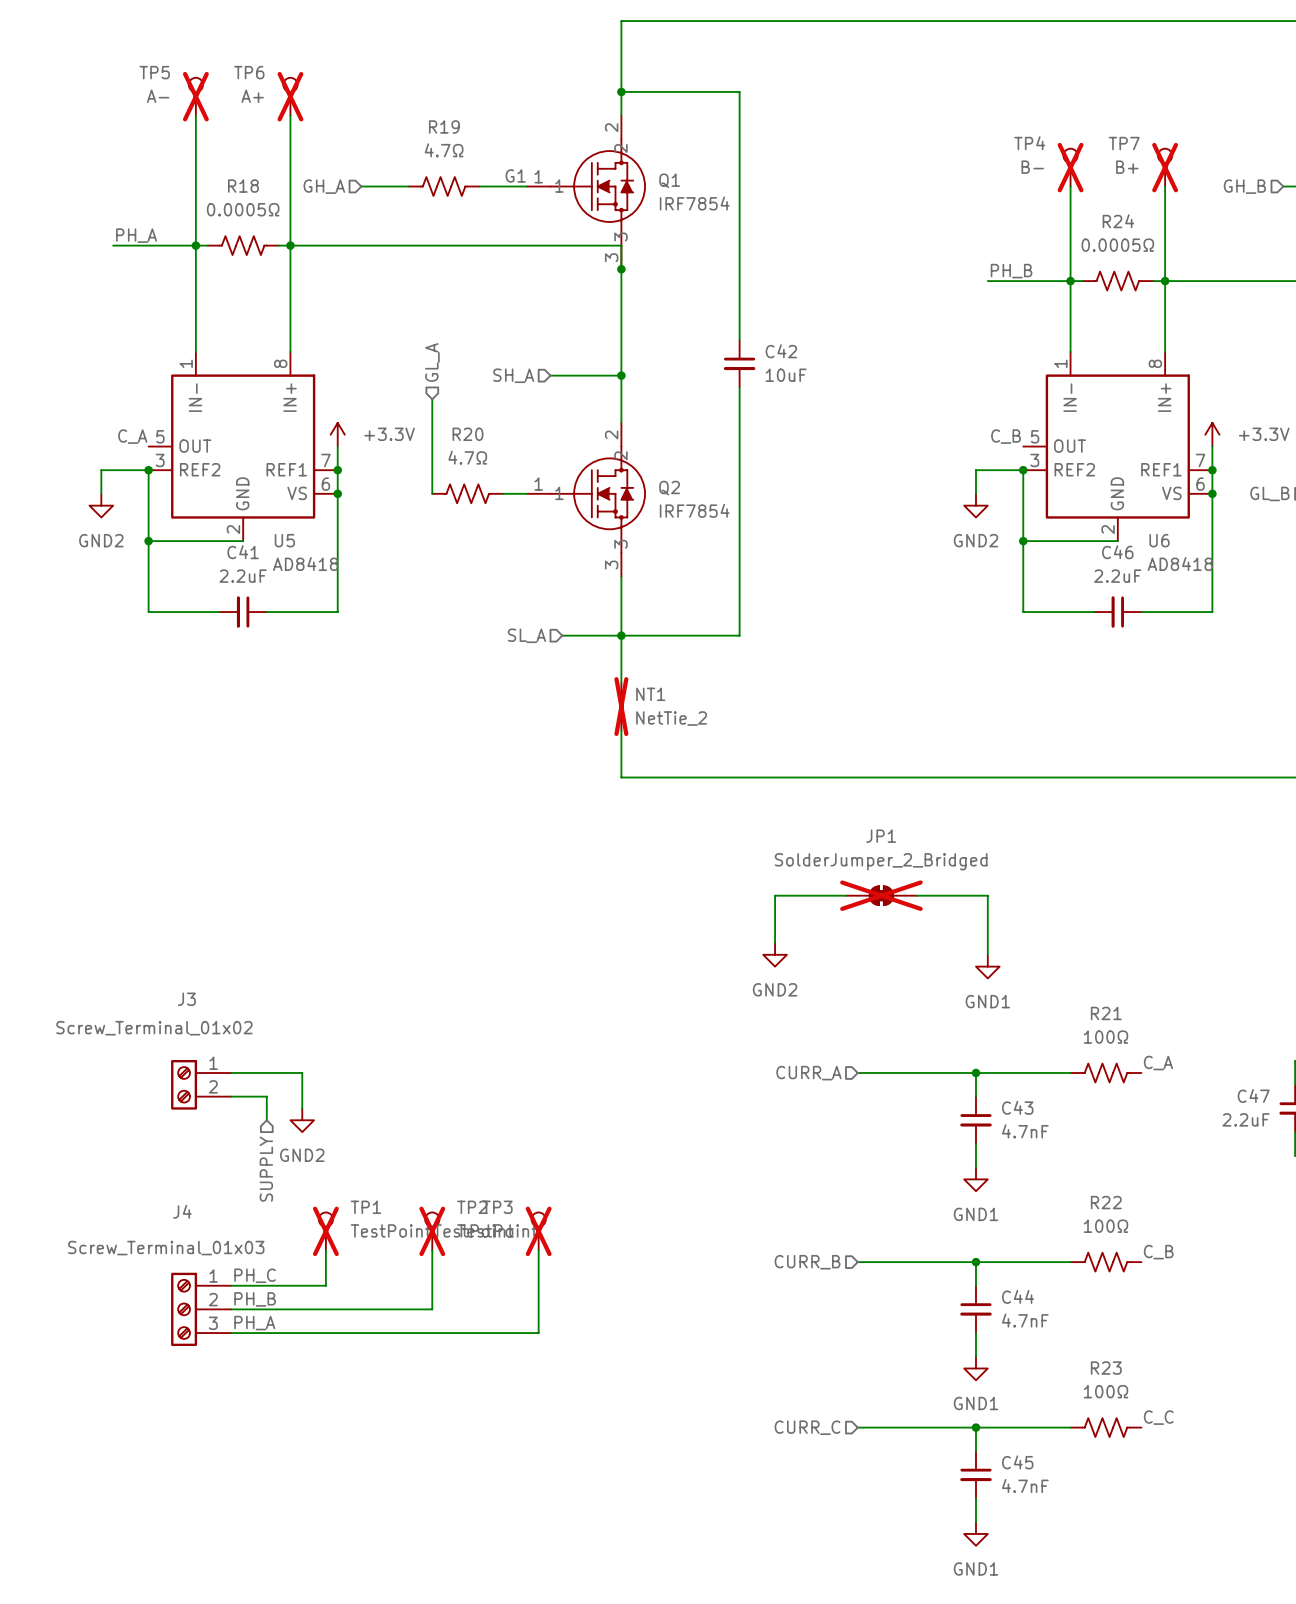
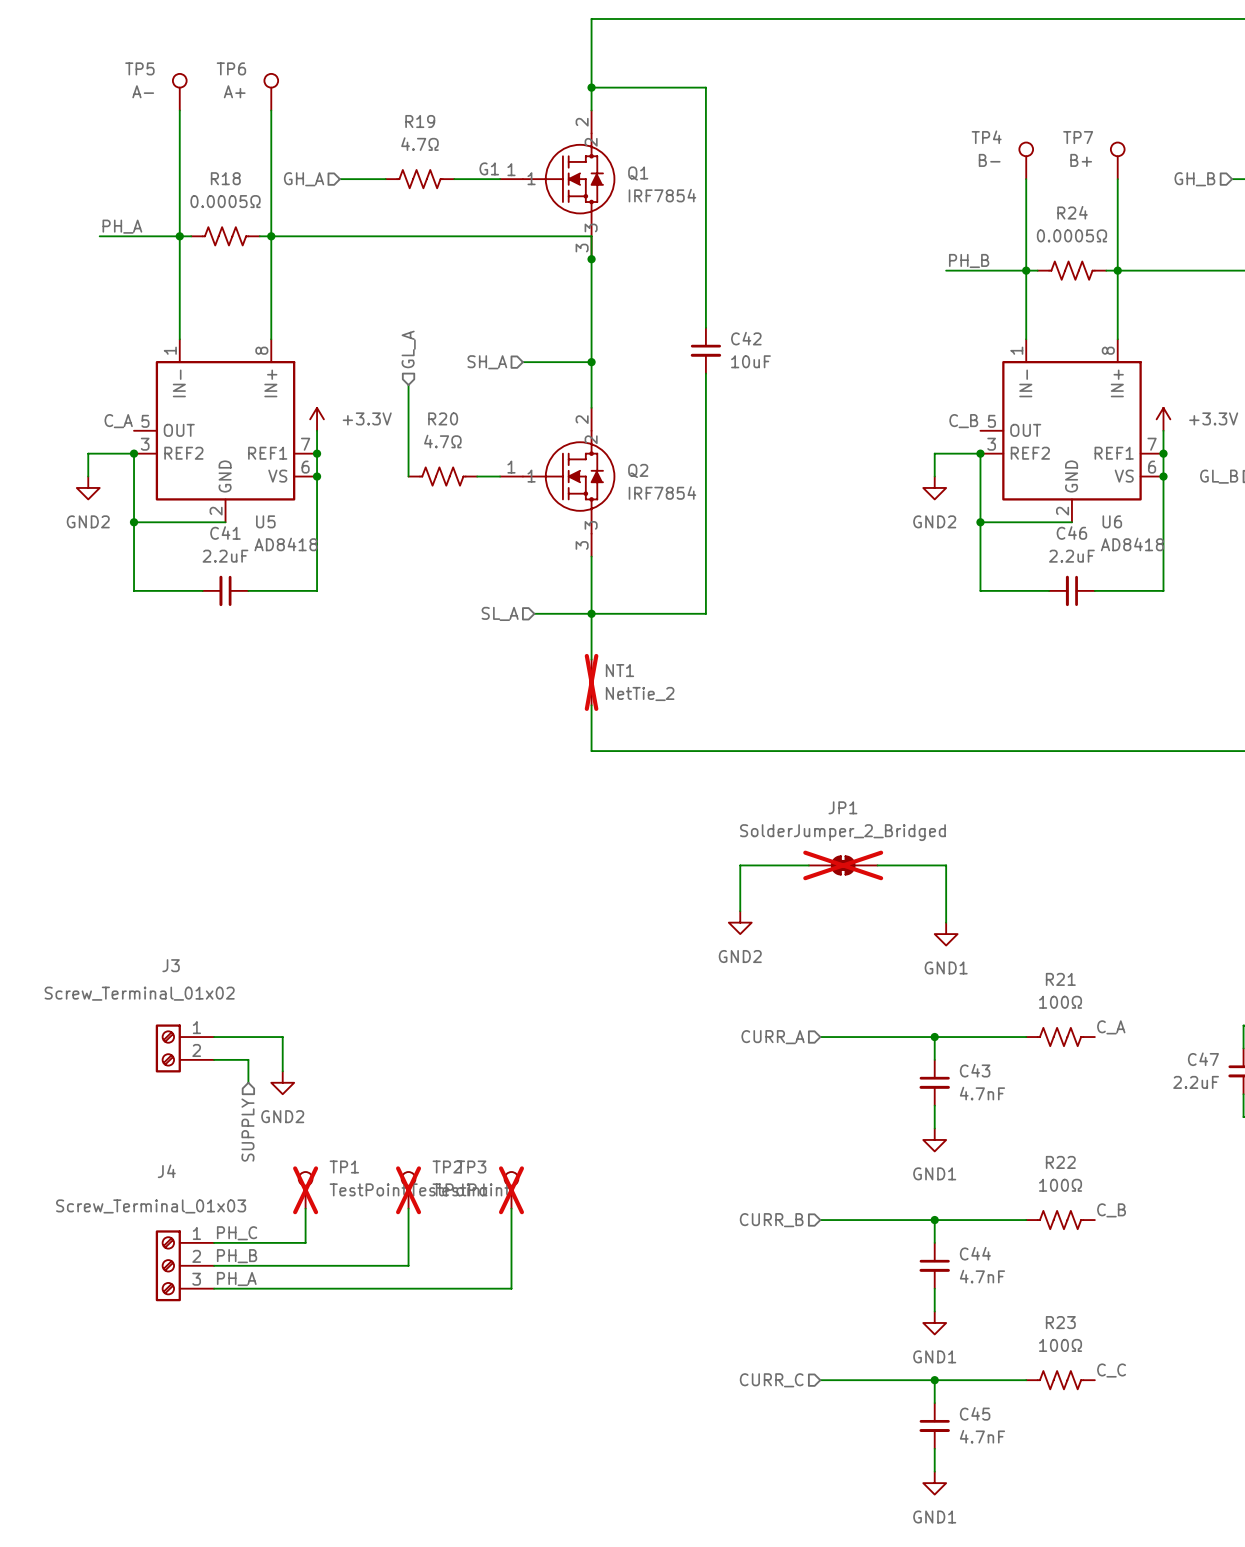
TP5 do-not-place cross: (195, 96) -> none
TP6 do-not-place cross: (290, 96) -> none
TP4 do-not-place cross: (1070, 167) -> none
TP7 do-not-place cross: (1165, 167) -> none

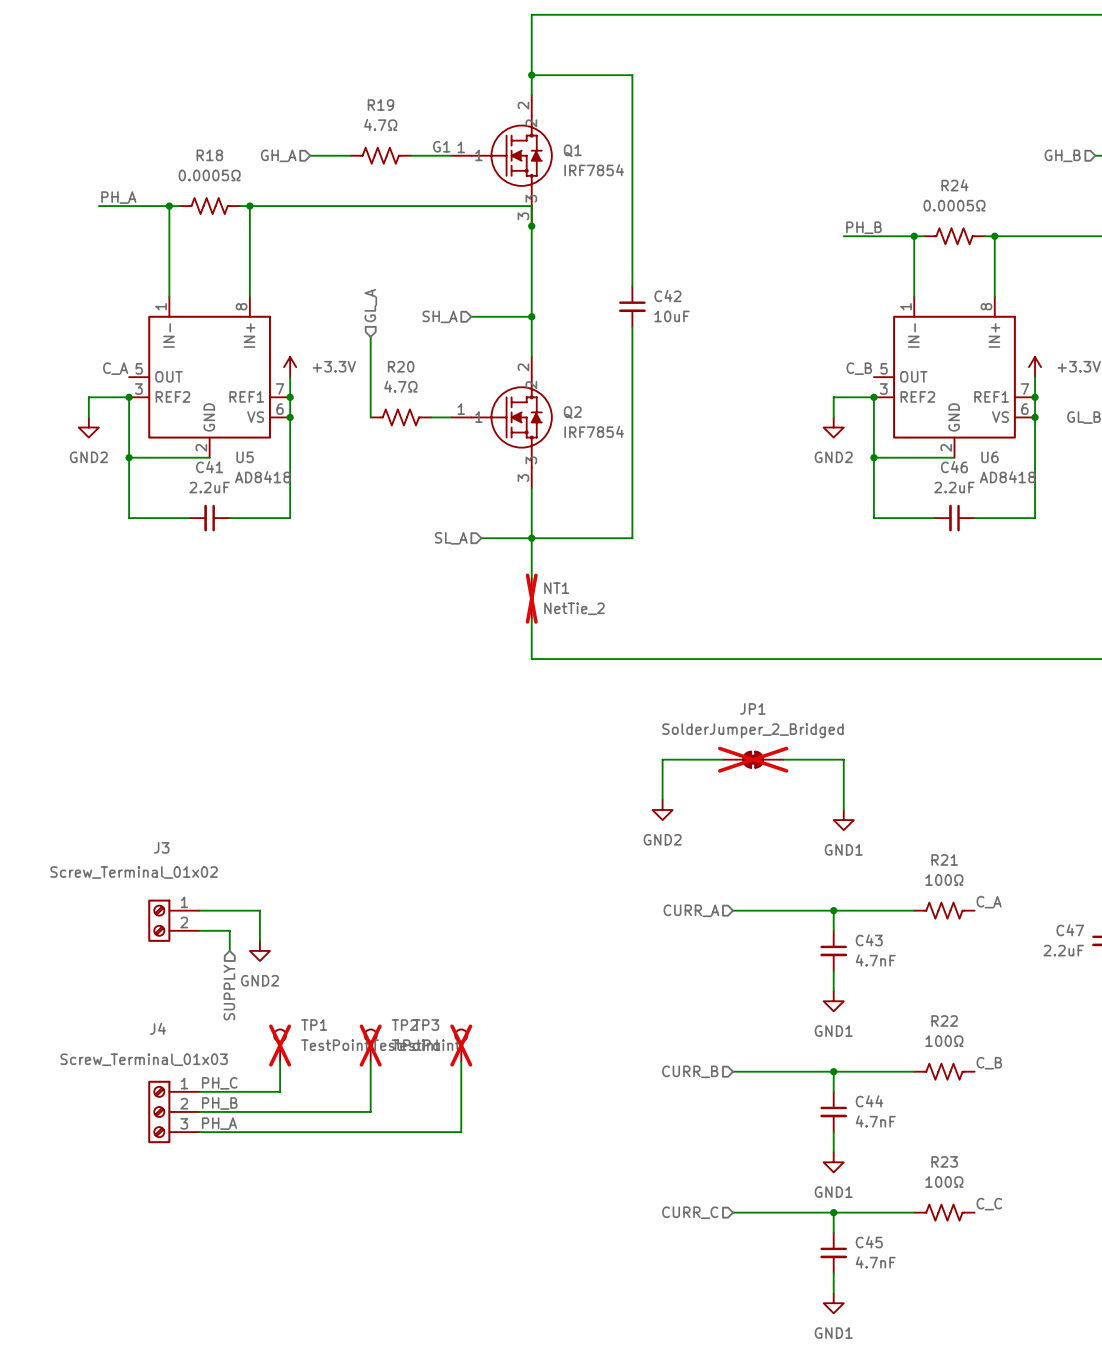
TP5: A- (179, 92) -> none
TP6: A+ (271, 92) -> none
wire: (179, 110) (179, 236) -> none
wire: (271, 110) (271, 236) -> none
TP4: B- (1026, 160) -> none
TP7: B+ (1117, 160) -> none
wire: (1026, 179) (1026, 270) -> none
wire: (1117, 179) (1117, 270) -> none

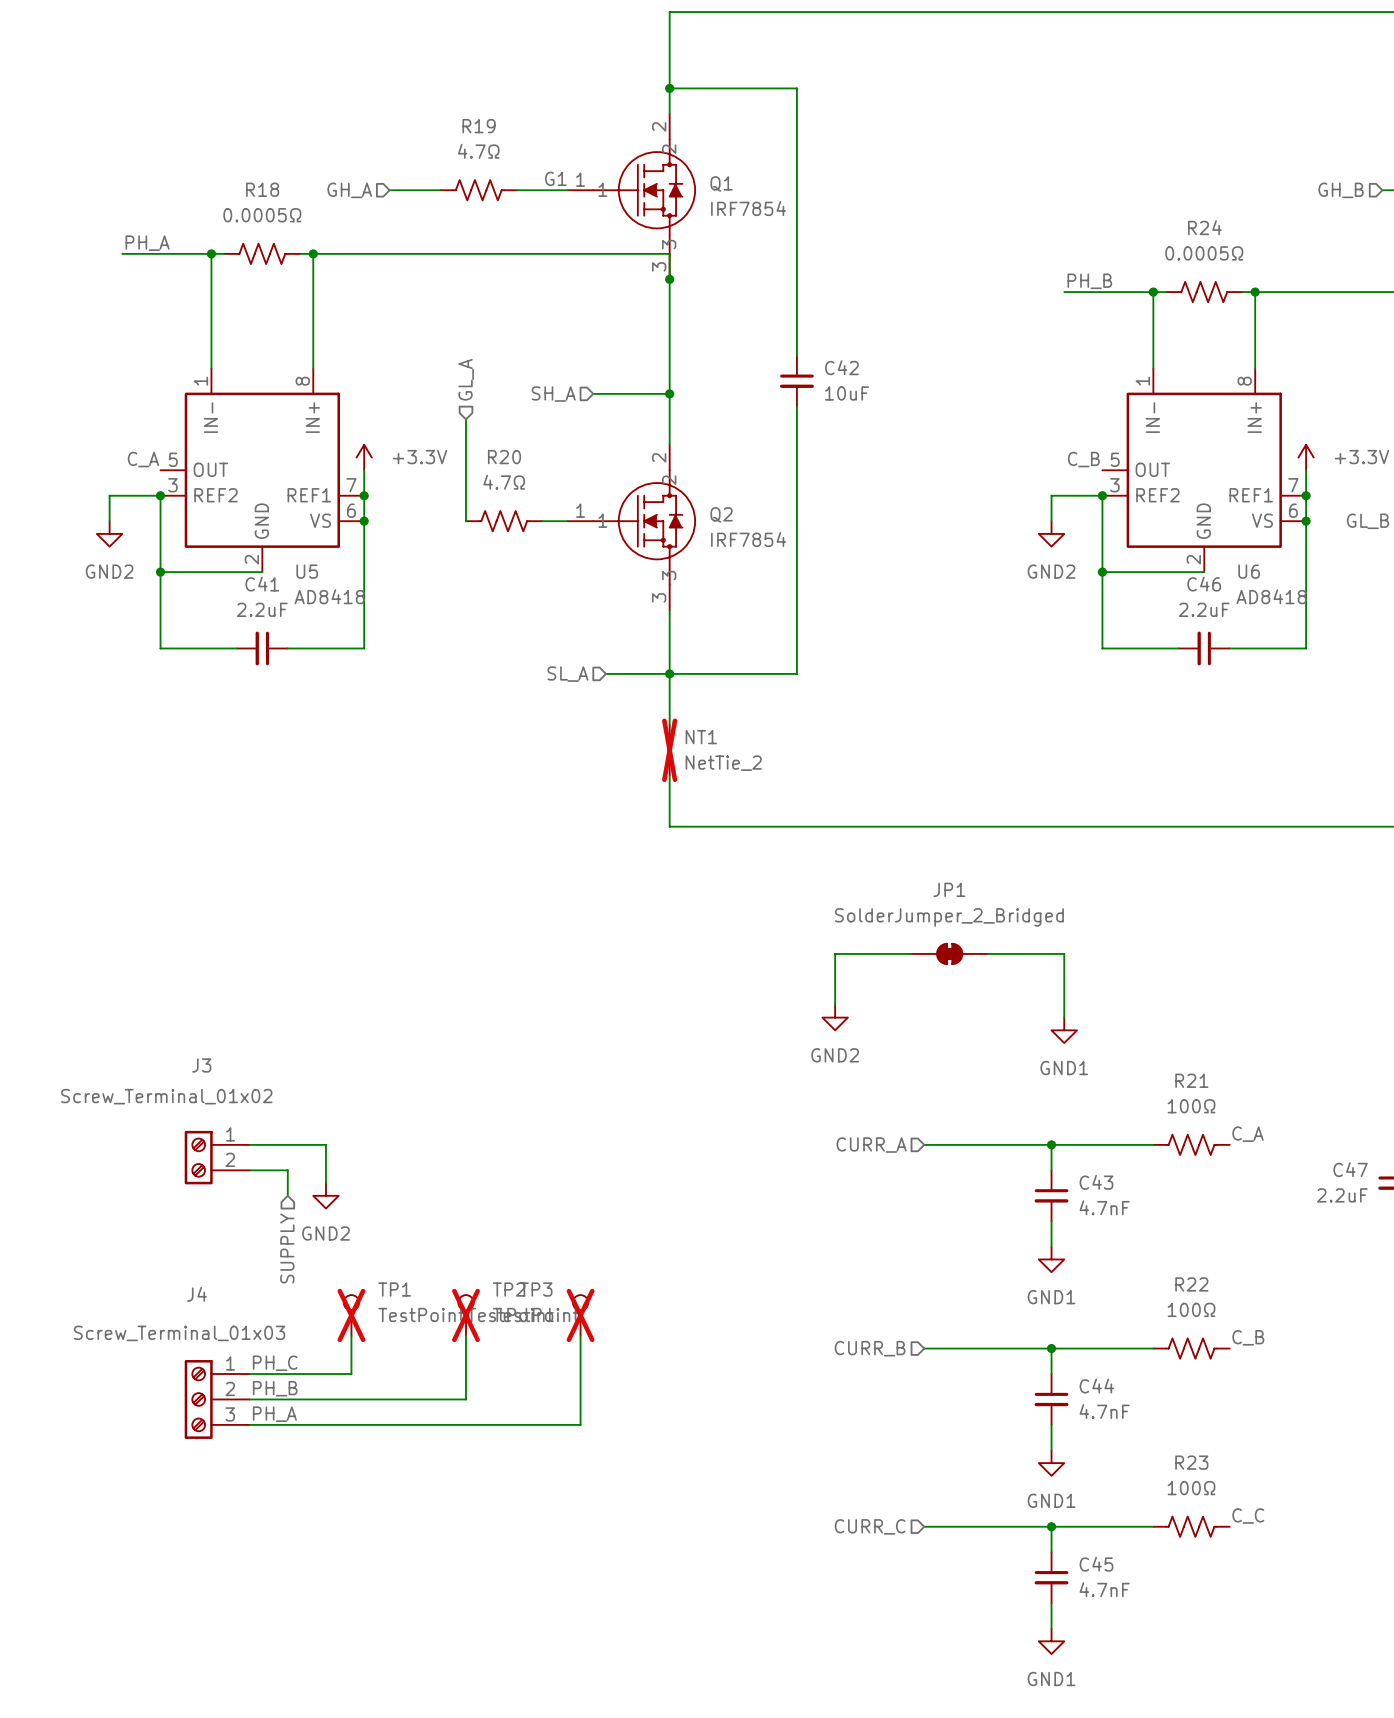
JP1 do-not-place cross: (753, 759) -> none

